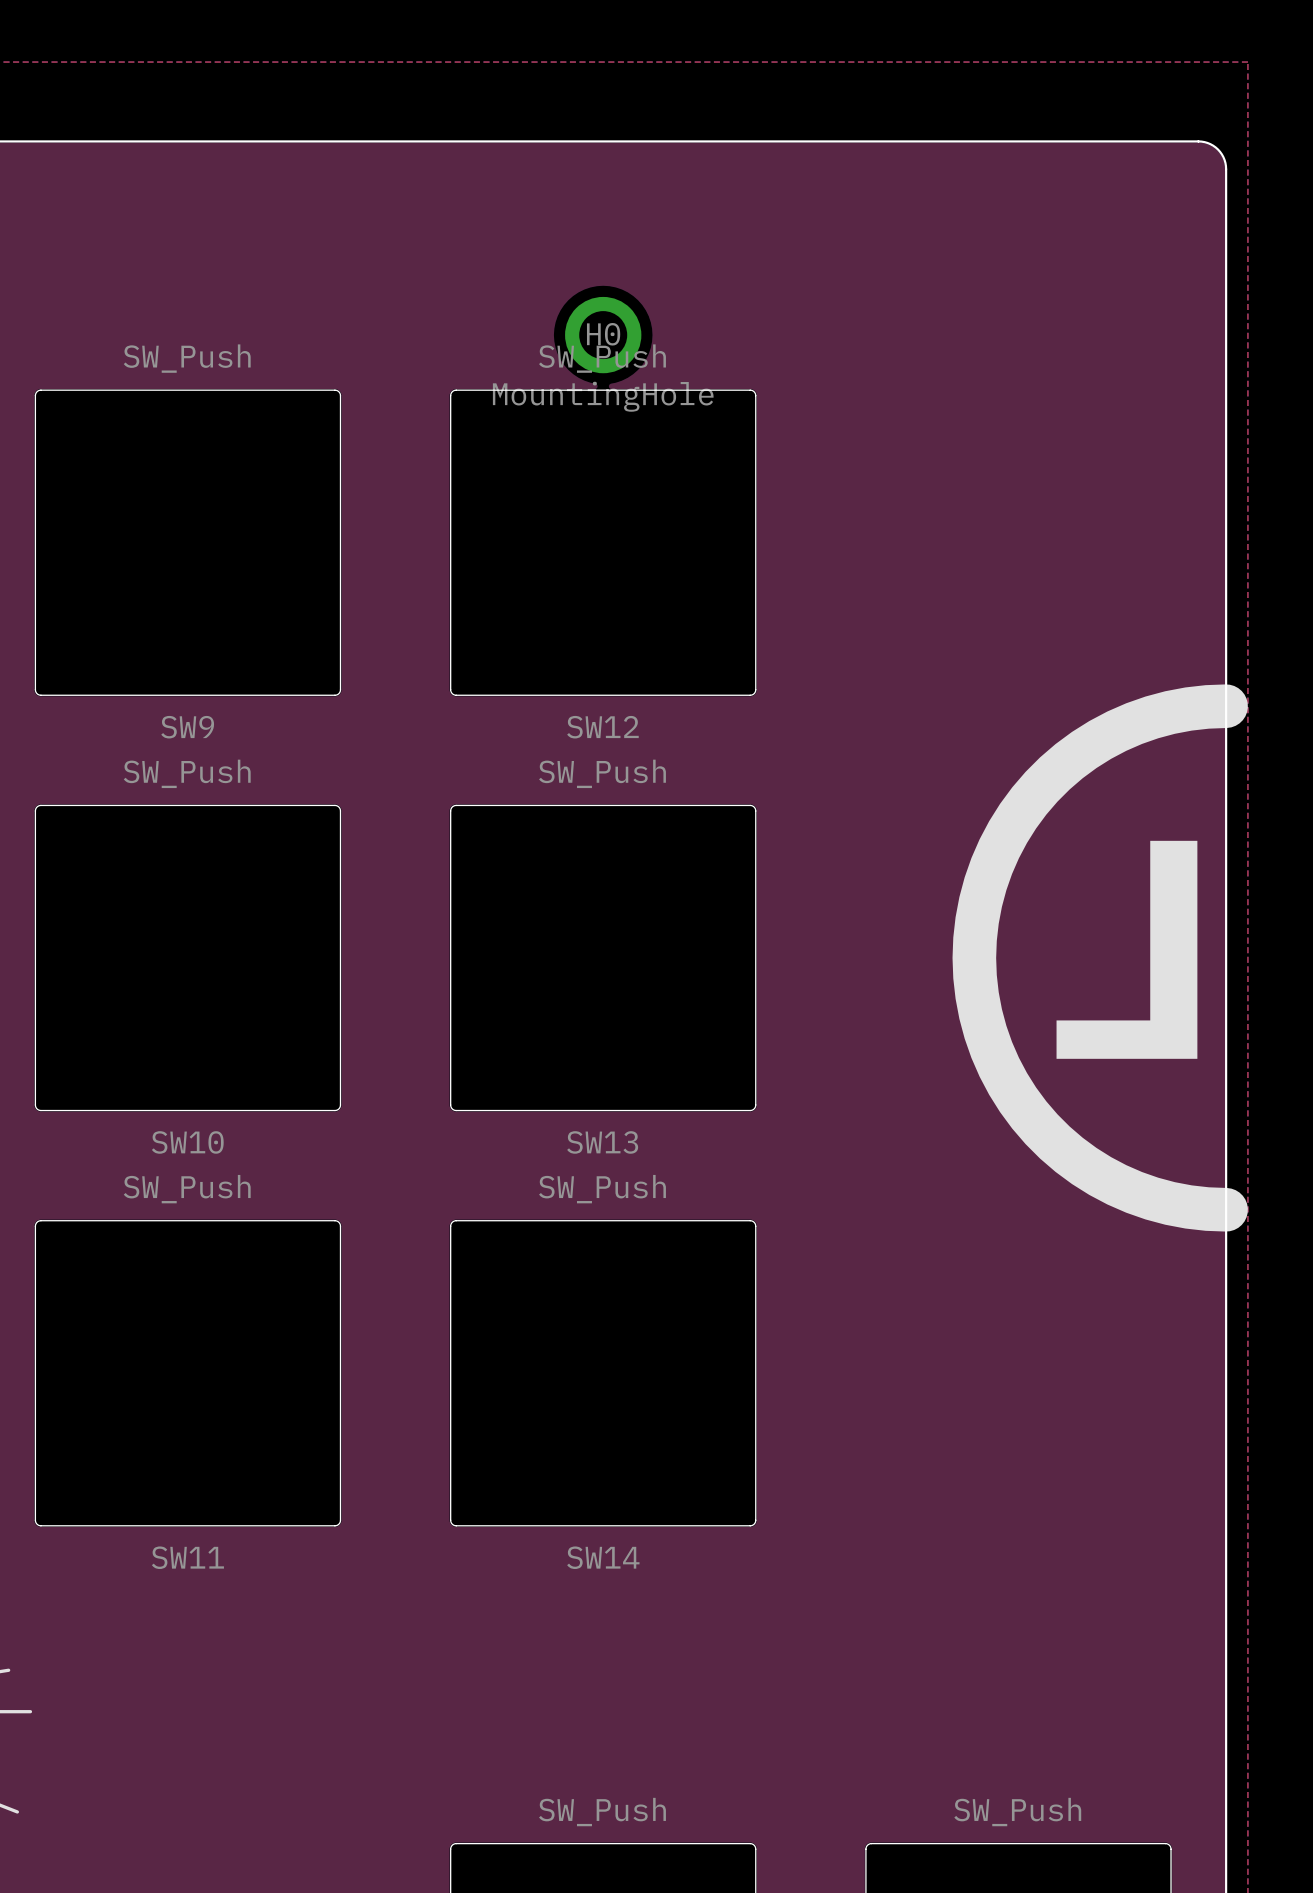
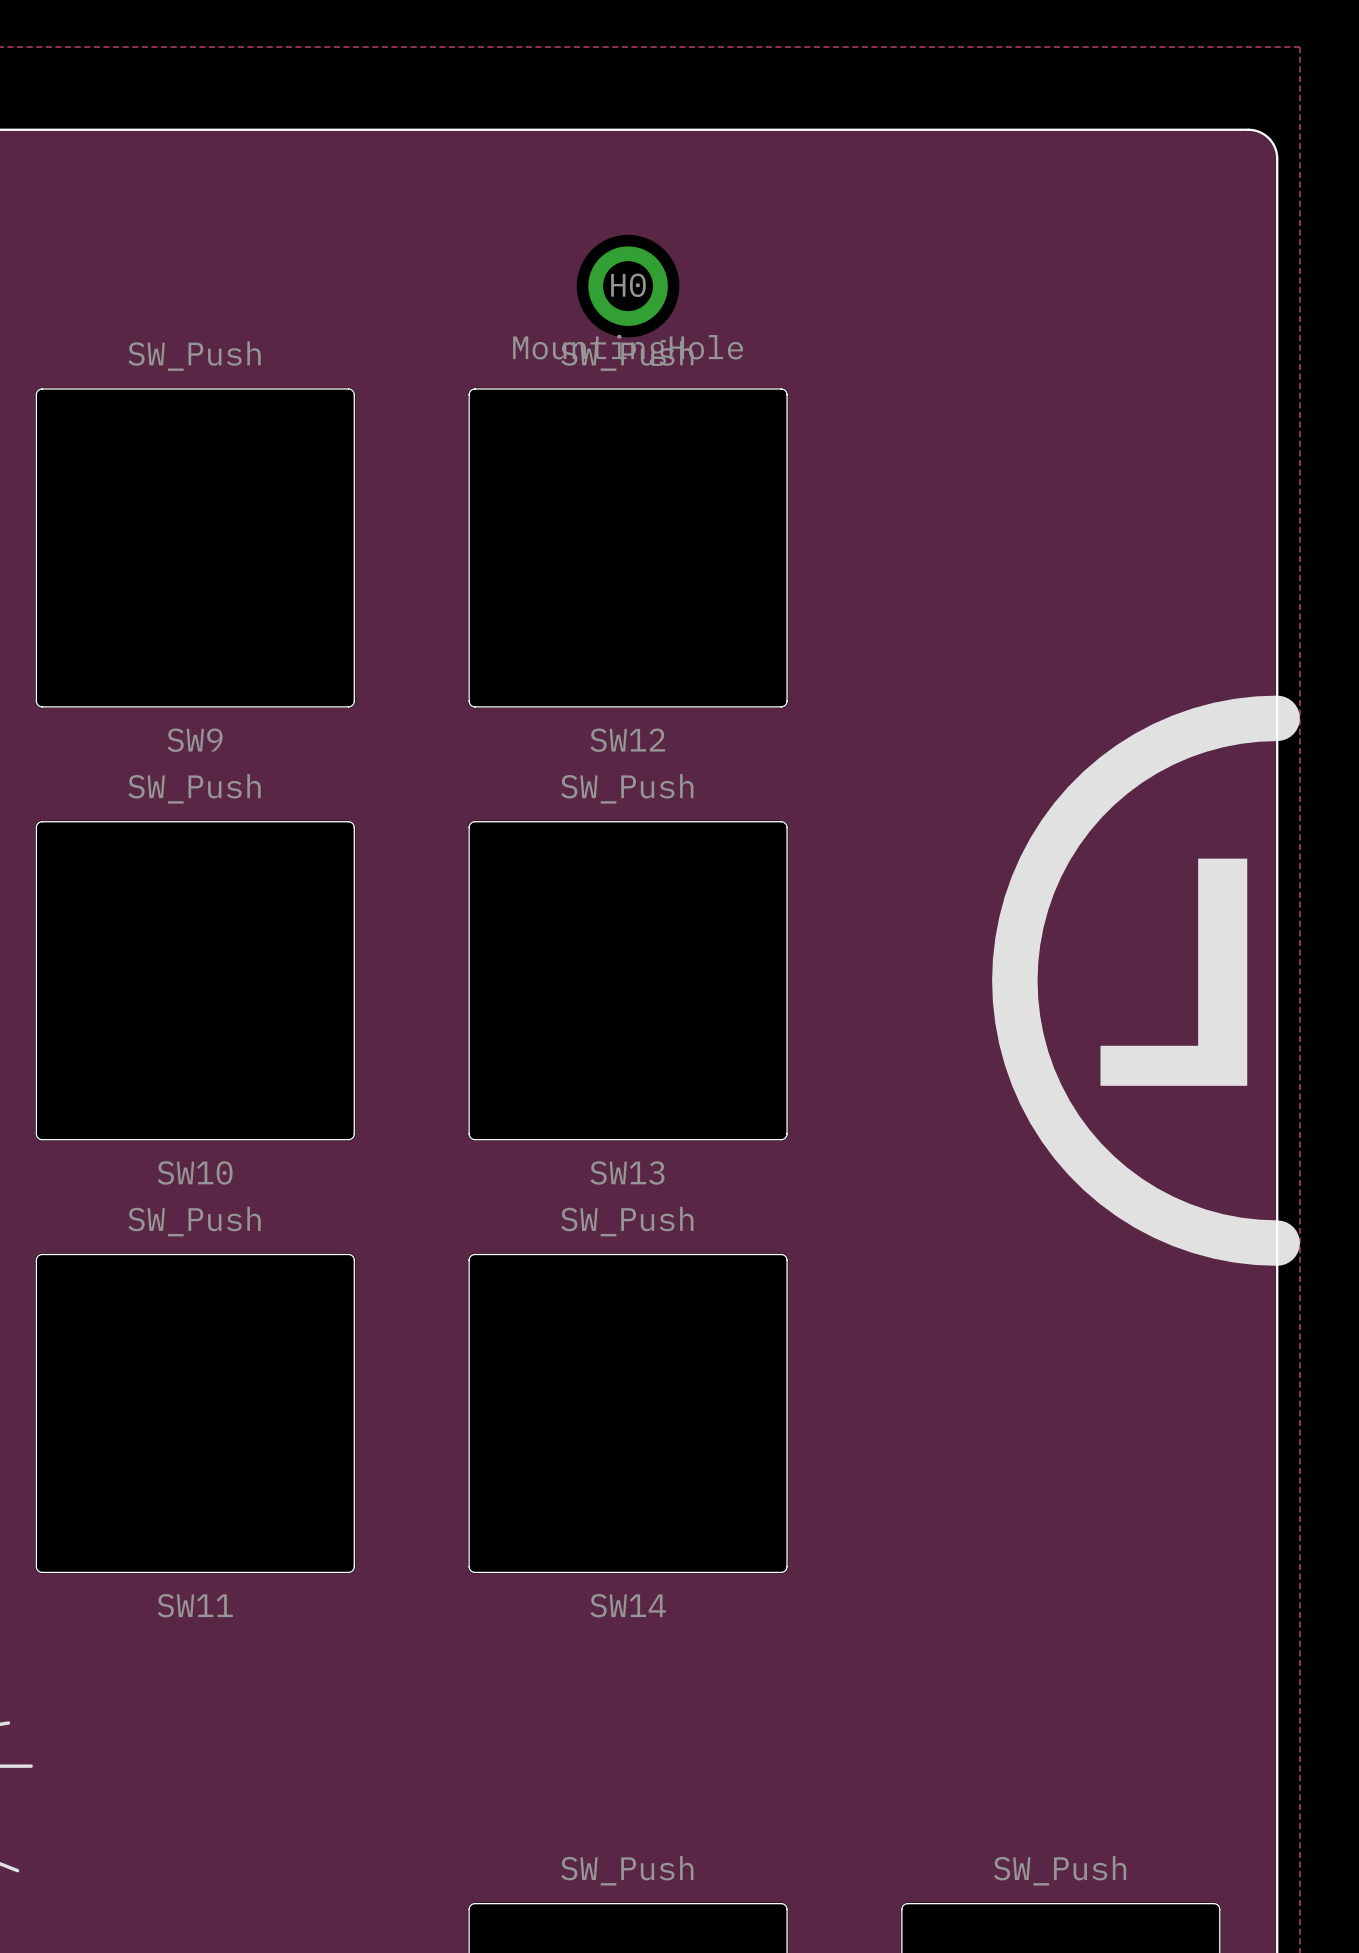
H0 position: (603, 335) -> (628, 286)

